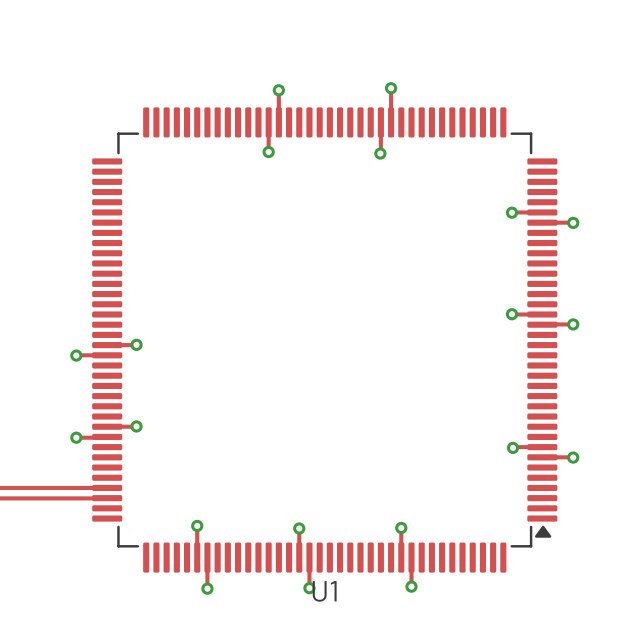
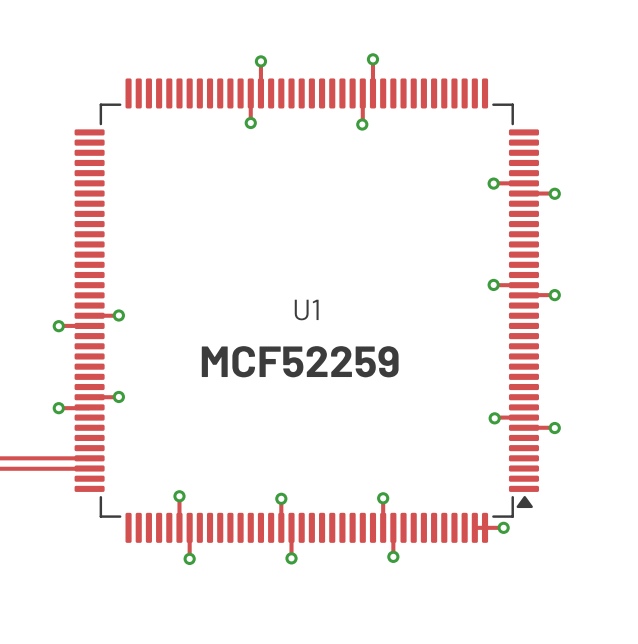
text: none -> MCF52259 (300, 361)
top track: none -> (474, 527) (503, 527)
via: none -> (503, 527)
U1 name position: U1 (324, 591) -> U1 (306, 310)

